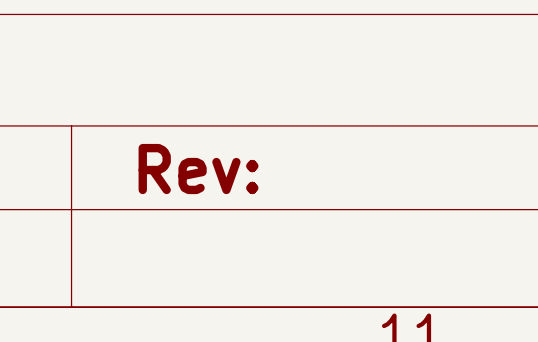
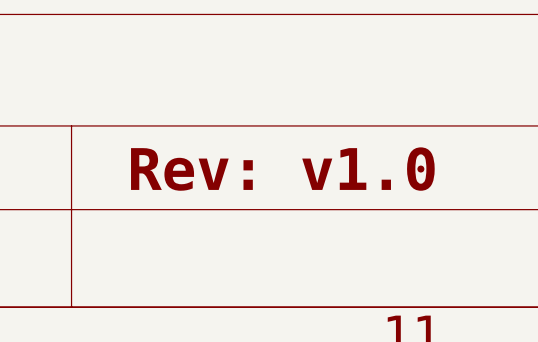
title block: Rev: (198, 169) -> Rev: v1.0 (282, 169)

